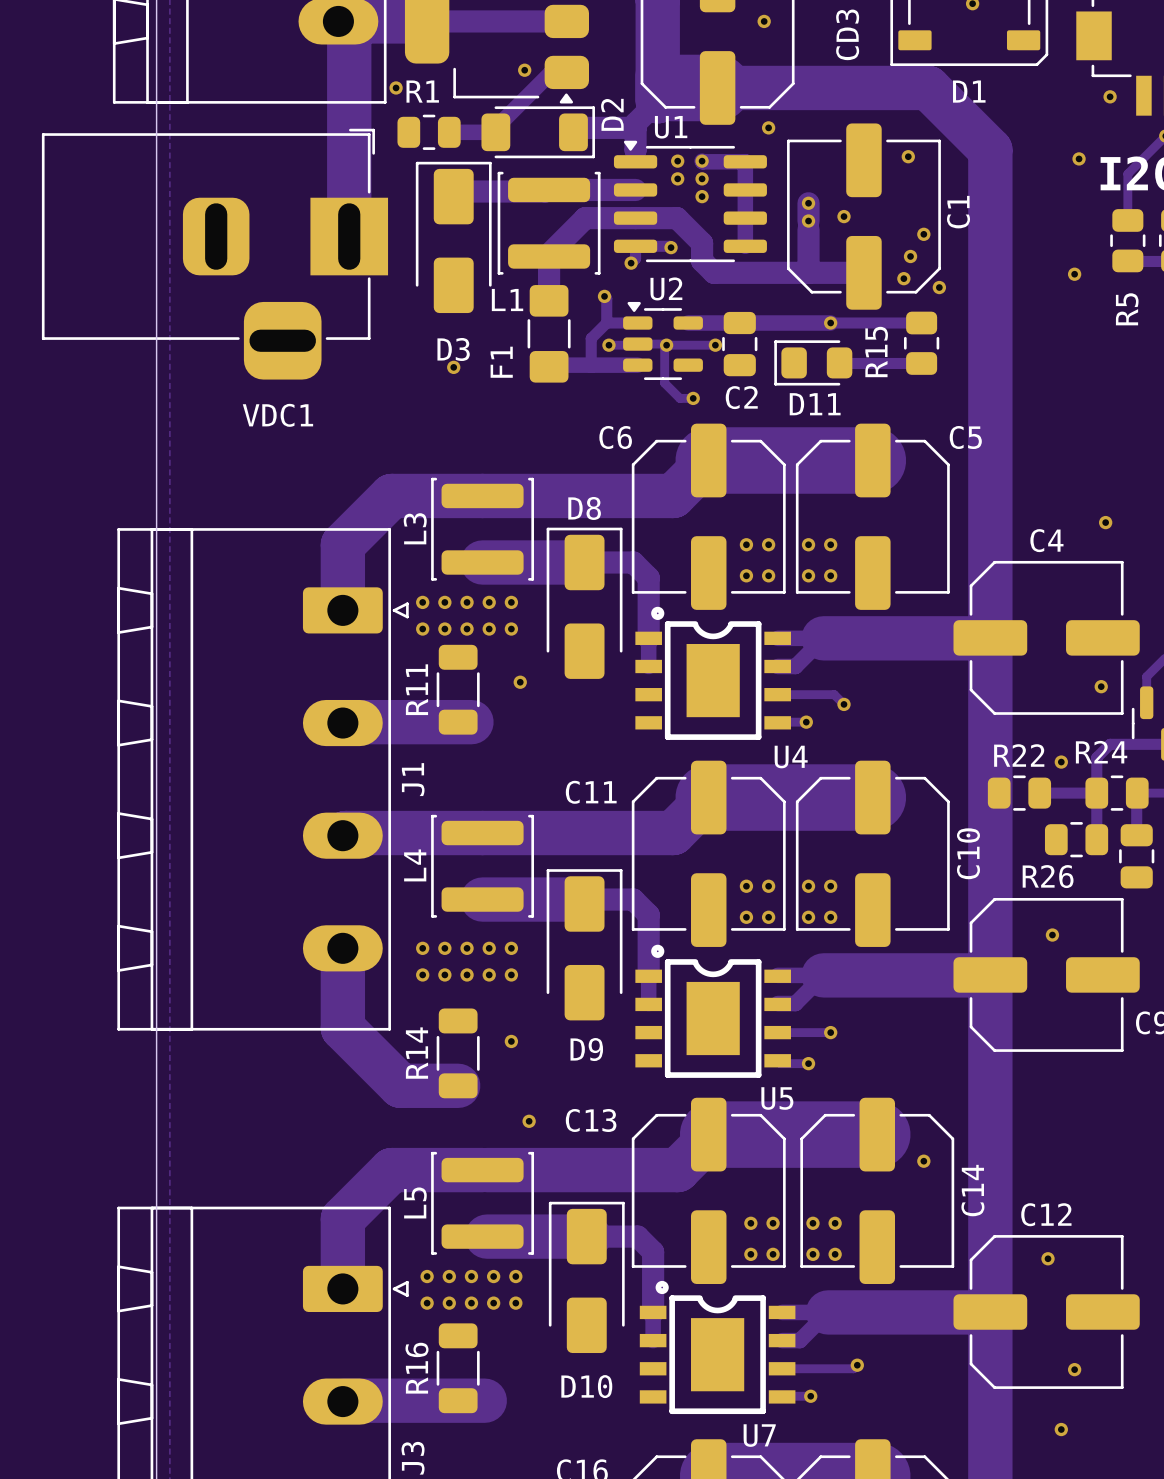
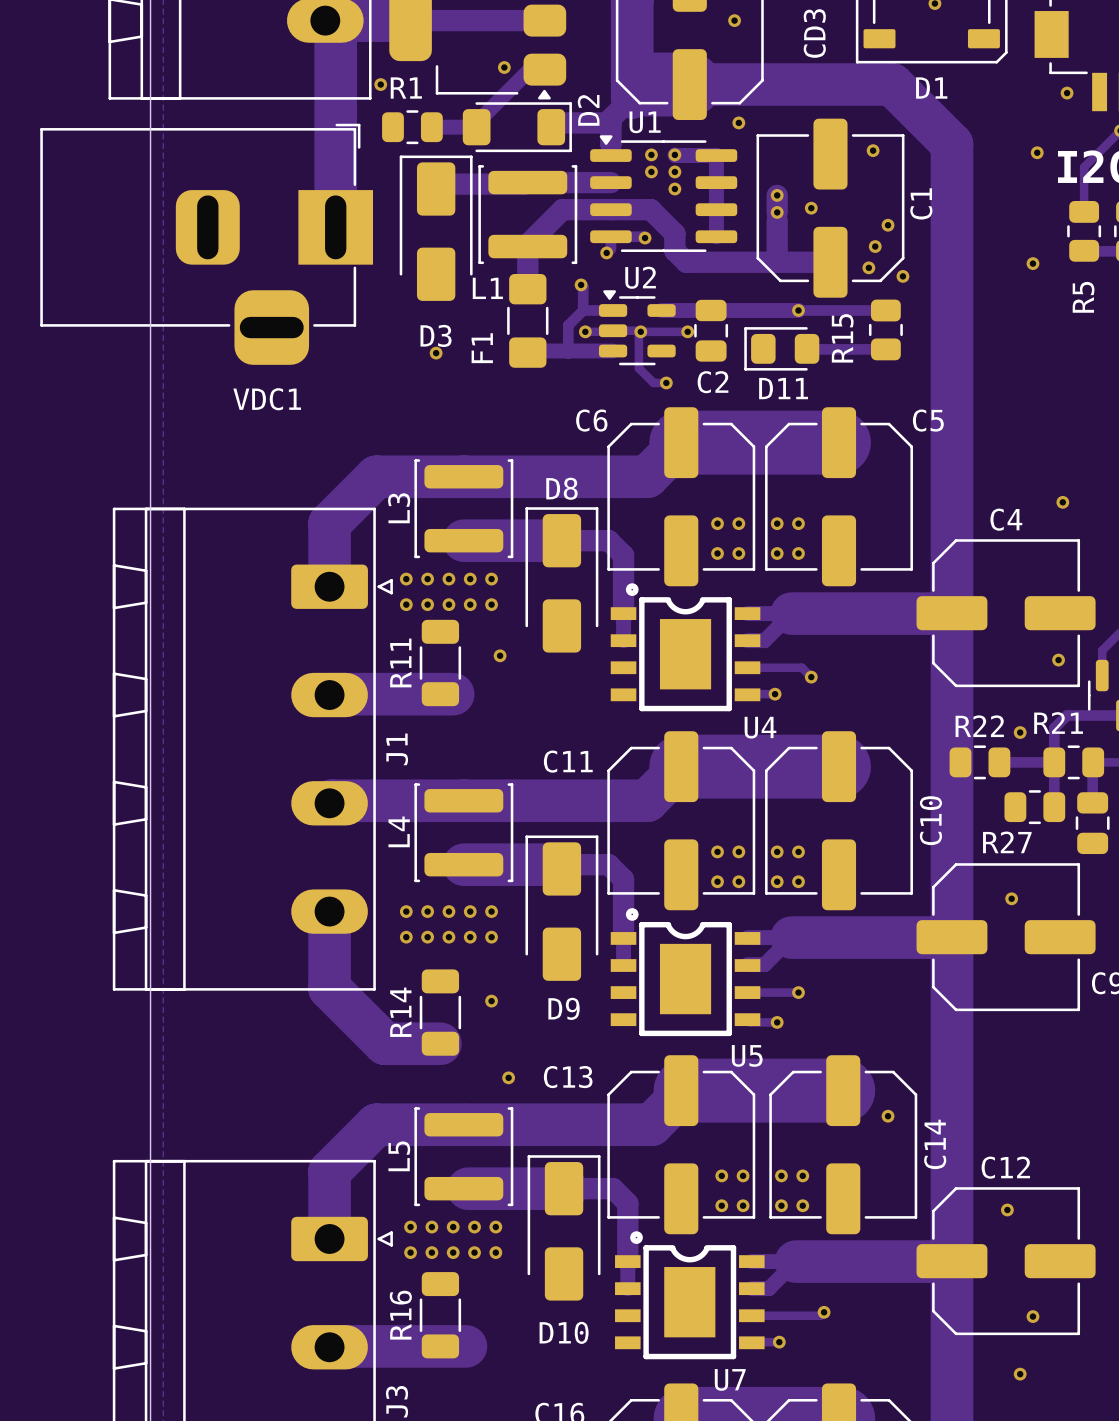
R24 name: R24 (1101, 752) -> R21 (1058, 723)
R26 name: R26 (1048, 876) -> R27 (1007, 842)

